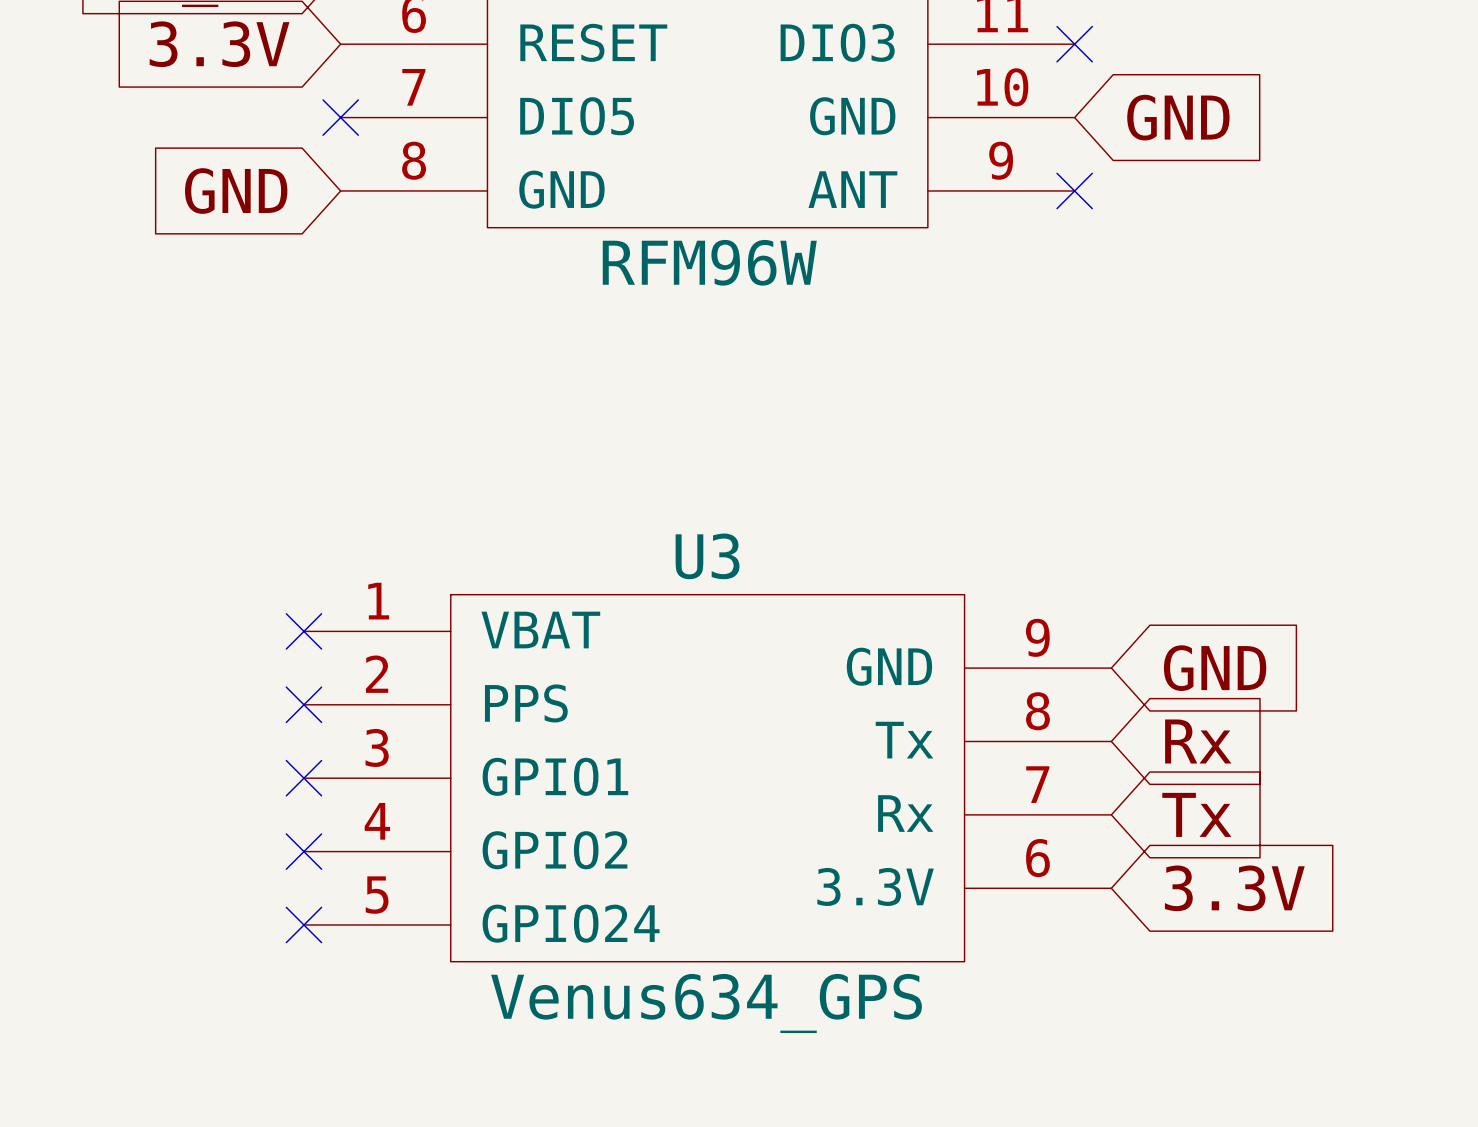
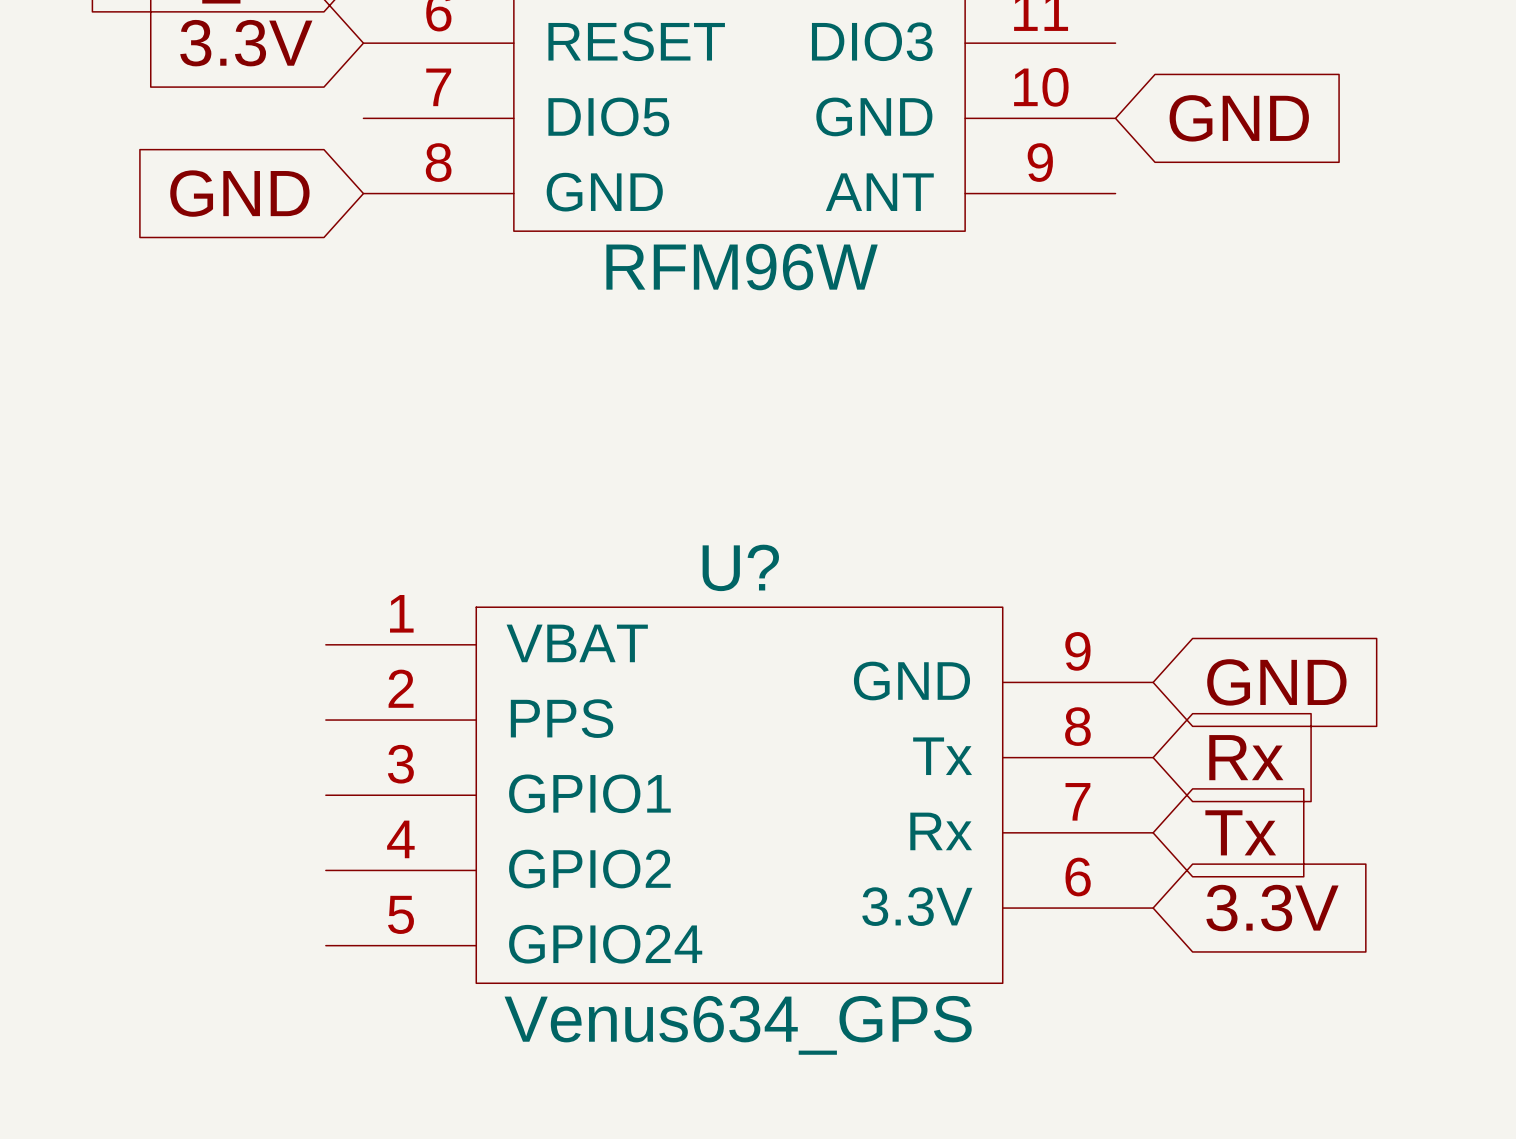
no-connect mark: (1074, 44) -> none
no-connect mark: (340, 117) -> none
no-connect mark: (1074, 190) -> none
U3 name: U3 (707, 556) -> U? (740, 567)
no-connect mark: (303, 631) -> none
no-connect mark: (303, 704) -> none
no-connect mark: (303, 778) -> none
no-connect mark: (303, 851) -> none
no-connect mark: (303, 924) -> none

